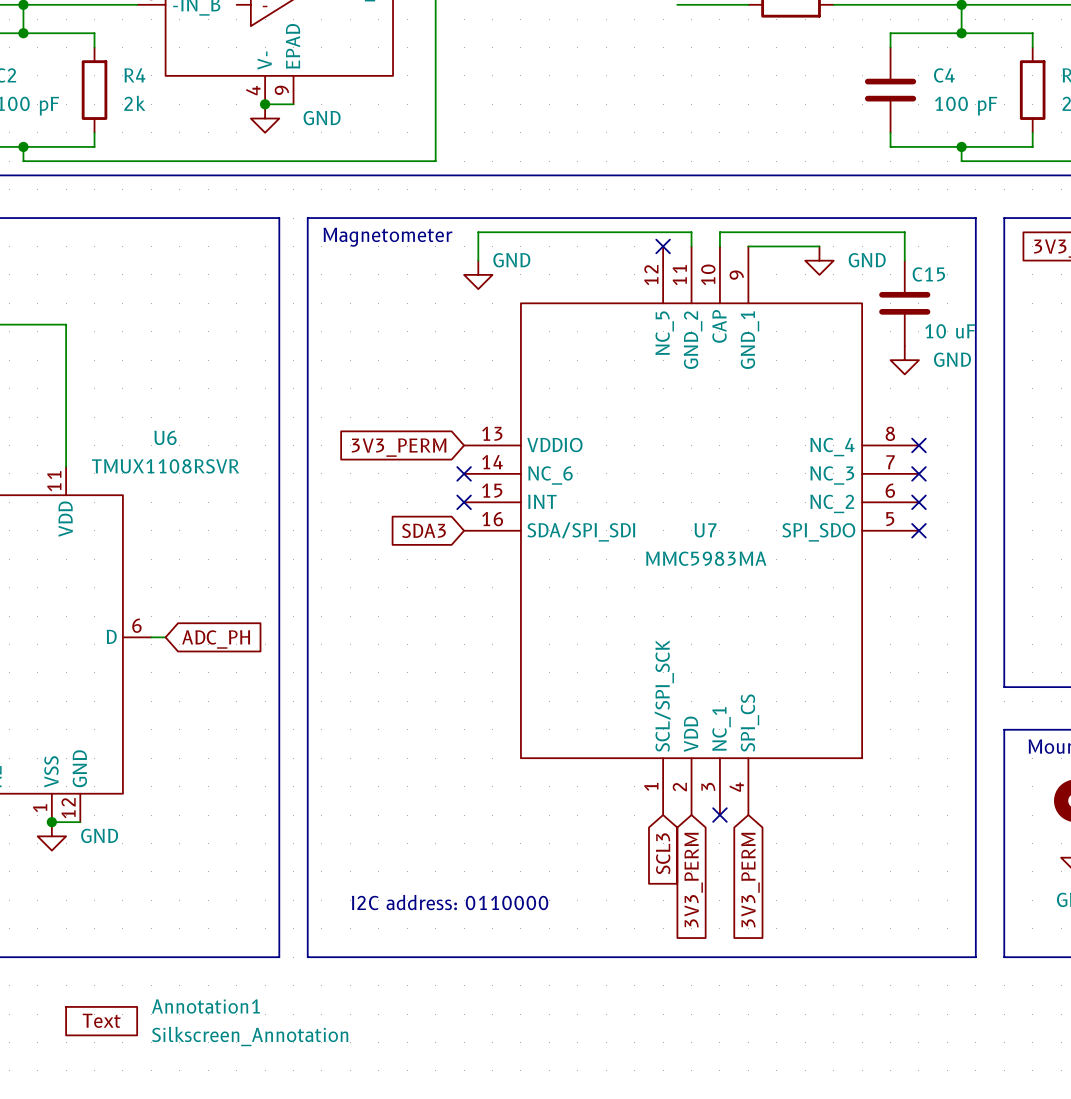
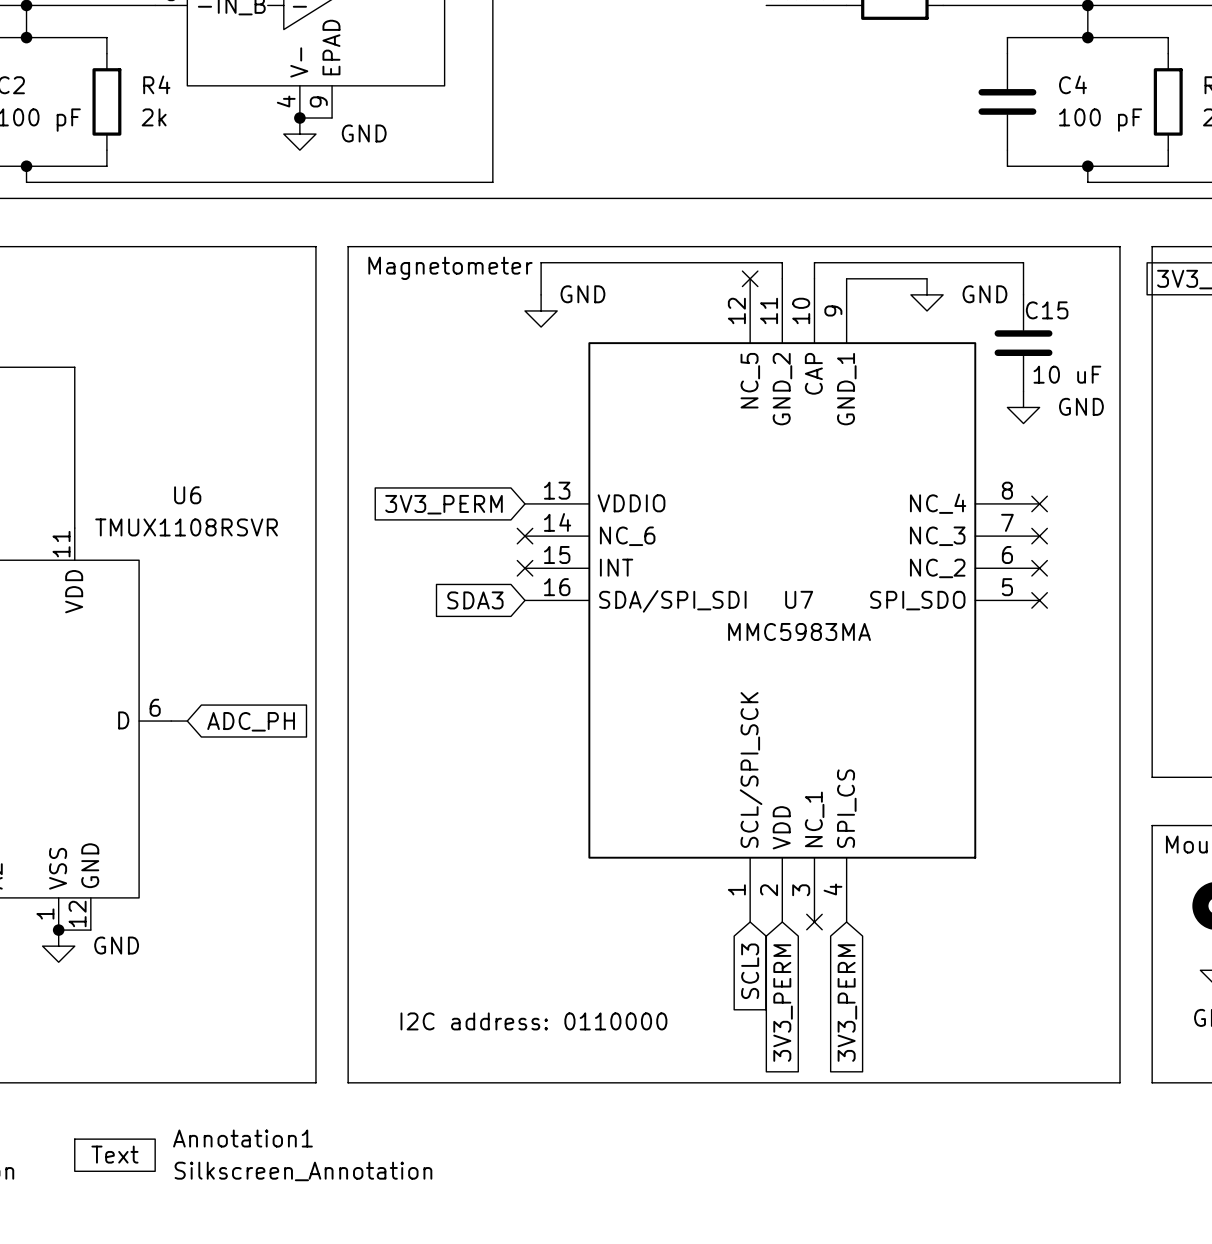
line: (975, 218) (975, 957) -> (1103, 246) (1119, 246) (1119, 1082) (1103, 1082)
line: (1018, 218) (1004, 218) (1004, 687) (1018, 687) -> (1152, 246) (1152, 777)
line: (1018, 729) (1004, 729) (1004, 957) (1018, 957) -> (1152, 825) (1152, 1082)

